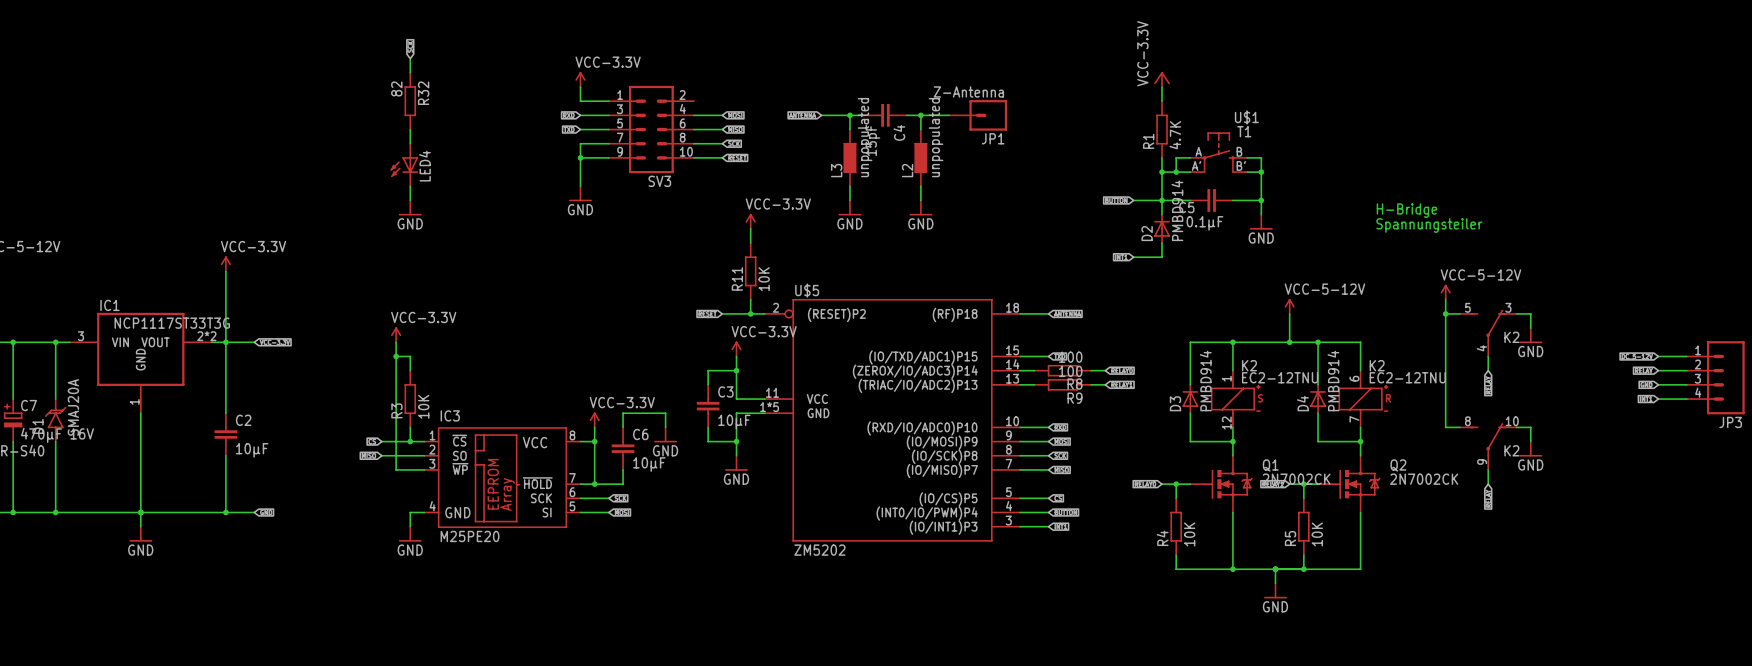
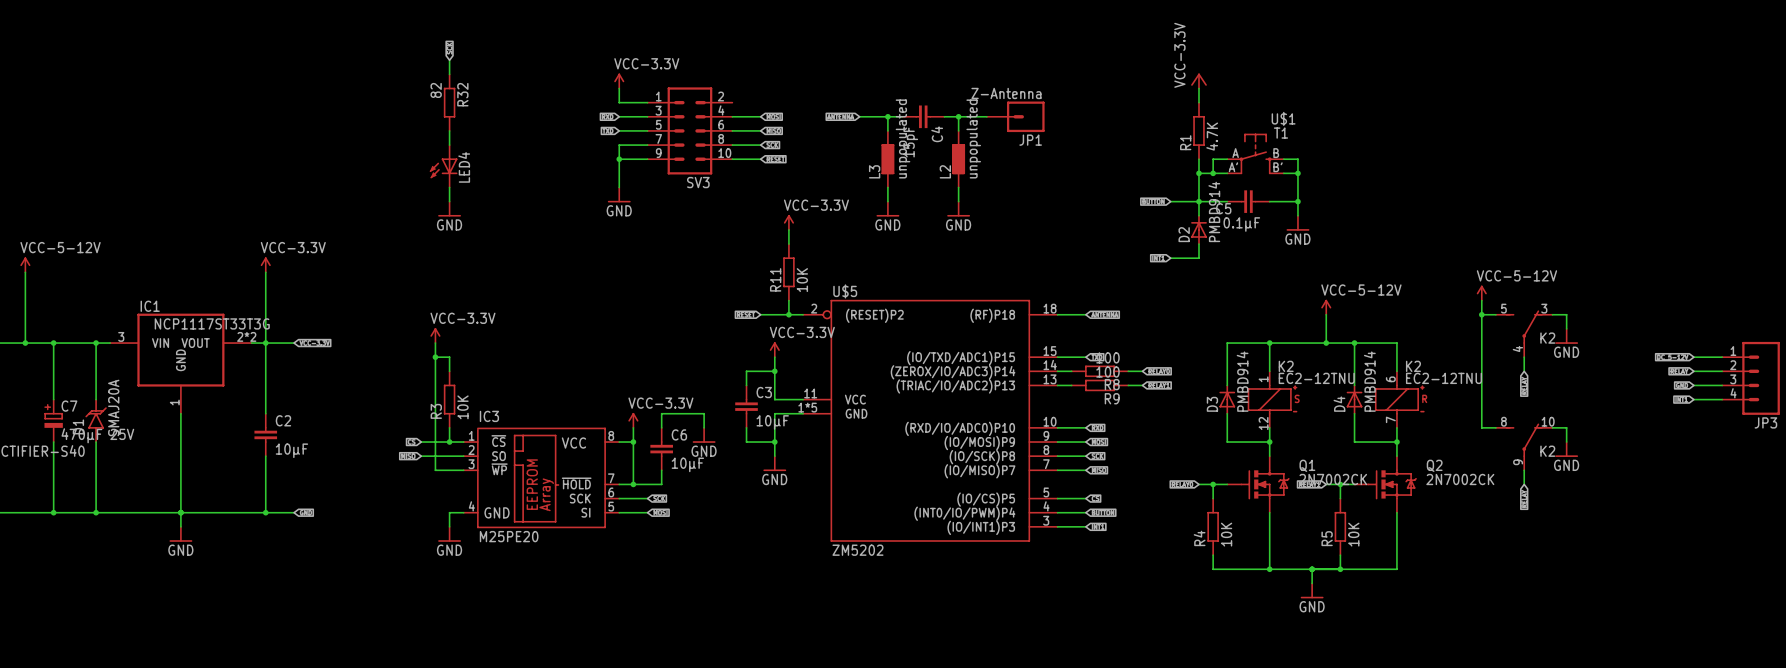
text: H-Bridge (1406, 210) -> none
text: Spannungsteiler (1429, 225) -> none
C7 value: 470µF 16V (57, 435) -> 470µF 25V (97, 435)

